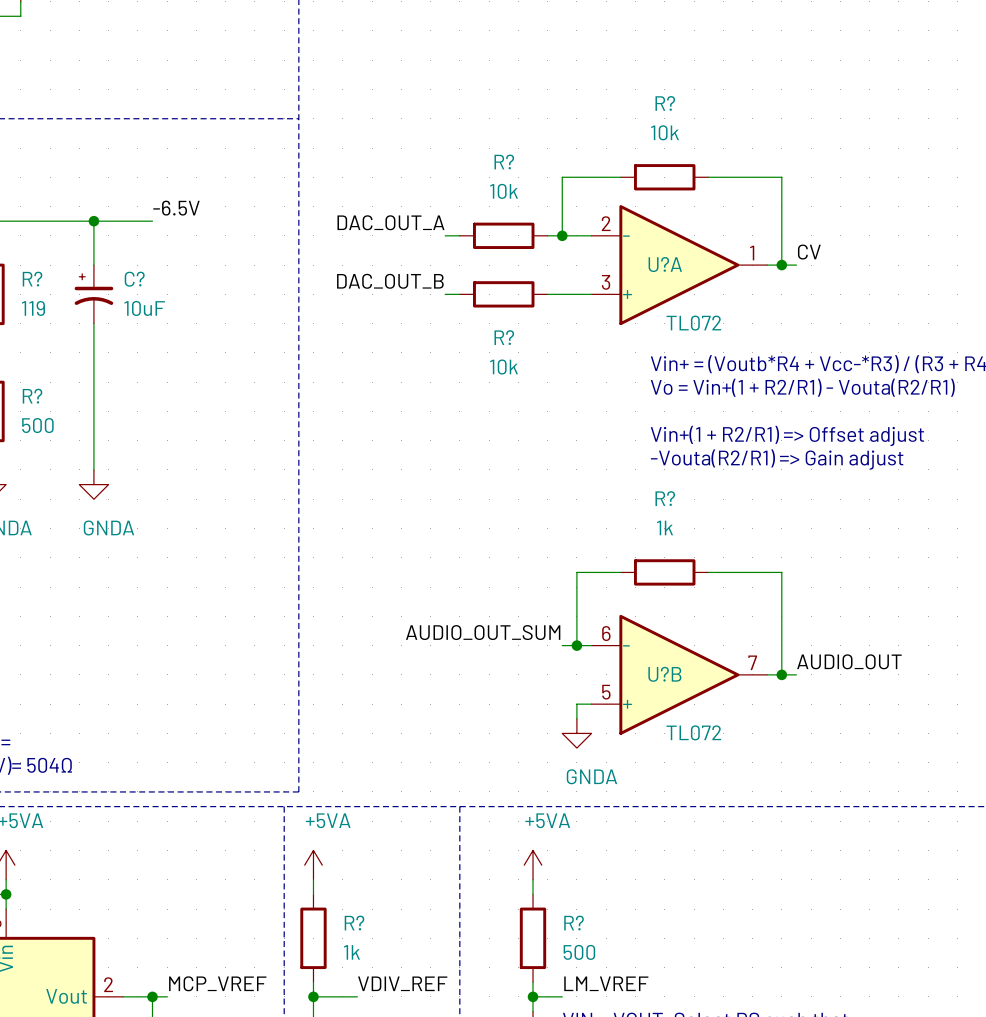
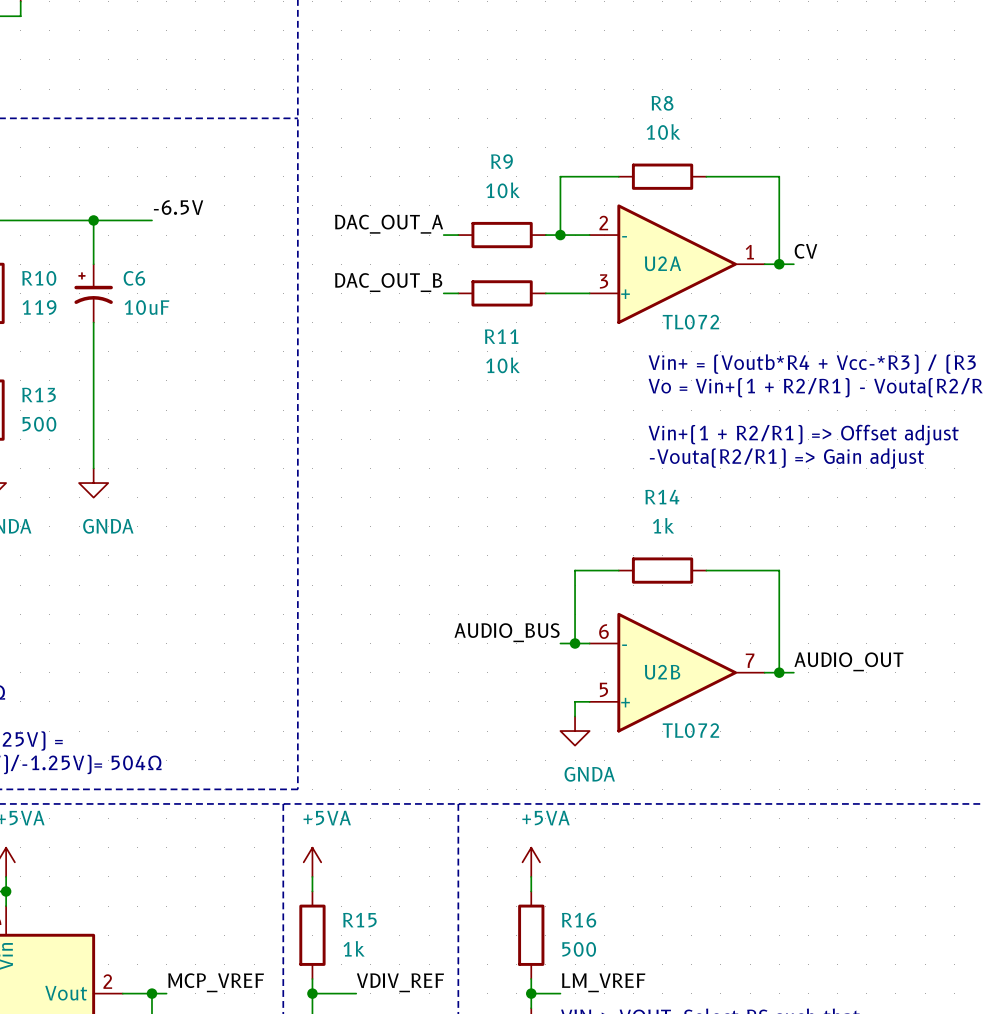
R? name: R? (665, 103) -> R8 (662, 103)
R? name: R? (504, 162) -> R9 (501, 161)
U?A name: U?A (665, 264) -> U2A (662, 263)
R? name: R? (32, 279) -> R10 (39, 278)
C? name: C? (134, 279) -> C6 (134, 278)
R? name: R? (504, 337) -> R11 (501, 336)
R? name: R? (32, 396) -> R13 (39, 394)
R? name: R? (665, 498) -> R14 (662, 497)
label: AUDIO_OUT_SUM (483, 632) -> AUDIO_BUS (507, 632)
U?B name: U?B (664, 674) -> U2B (662, 672)
R? name: R? (354, 923) -> R15 (359, 920)
R? name: R? (574, 923) -> R16 (579, 920)

